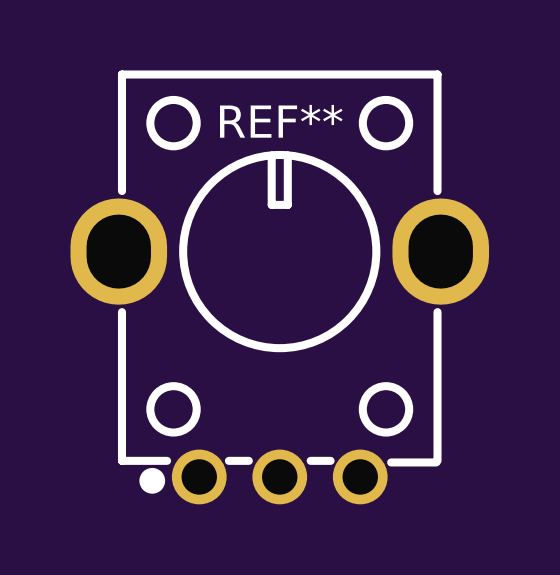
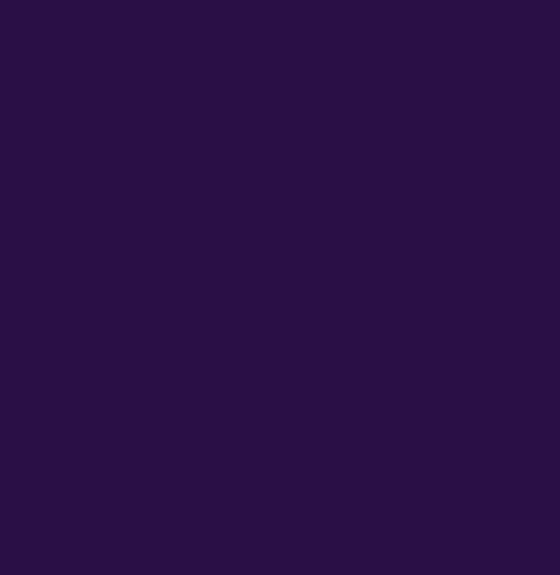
REF**: (279, 287) -> none

